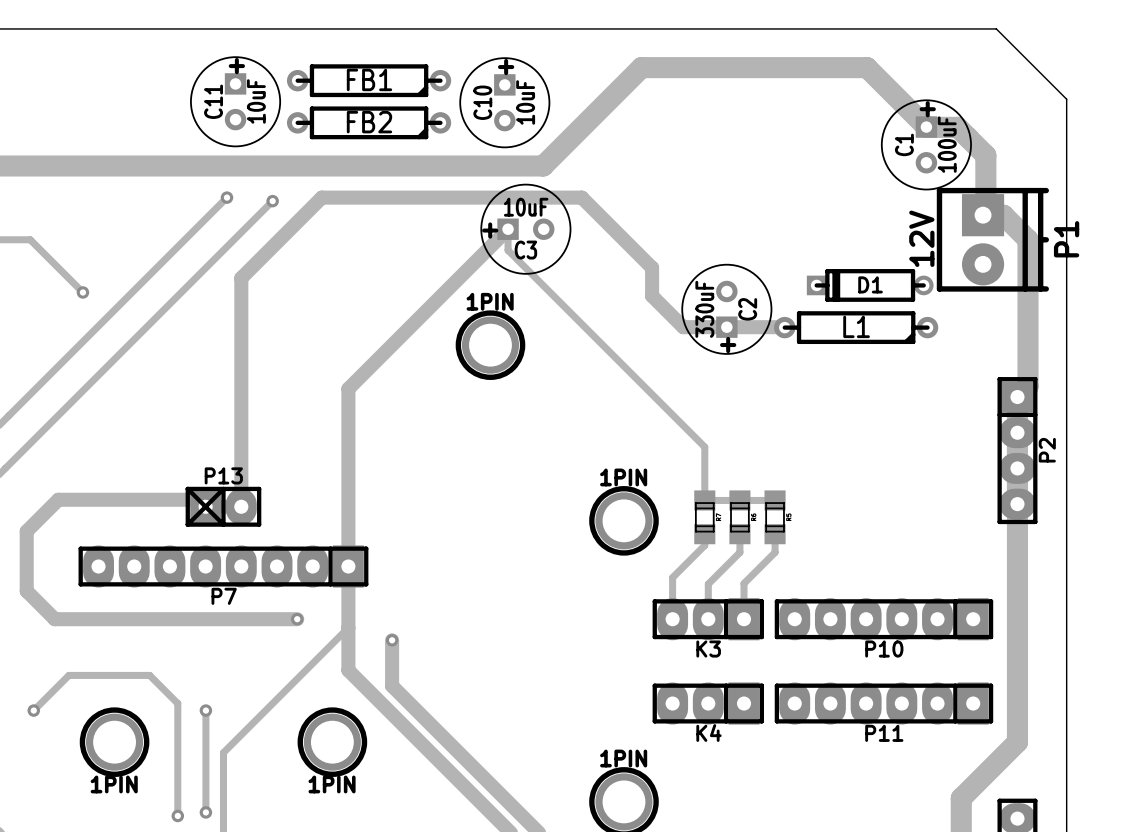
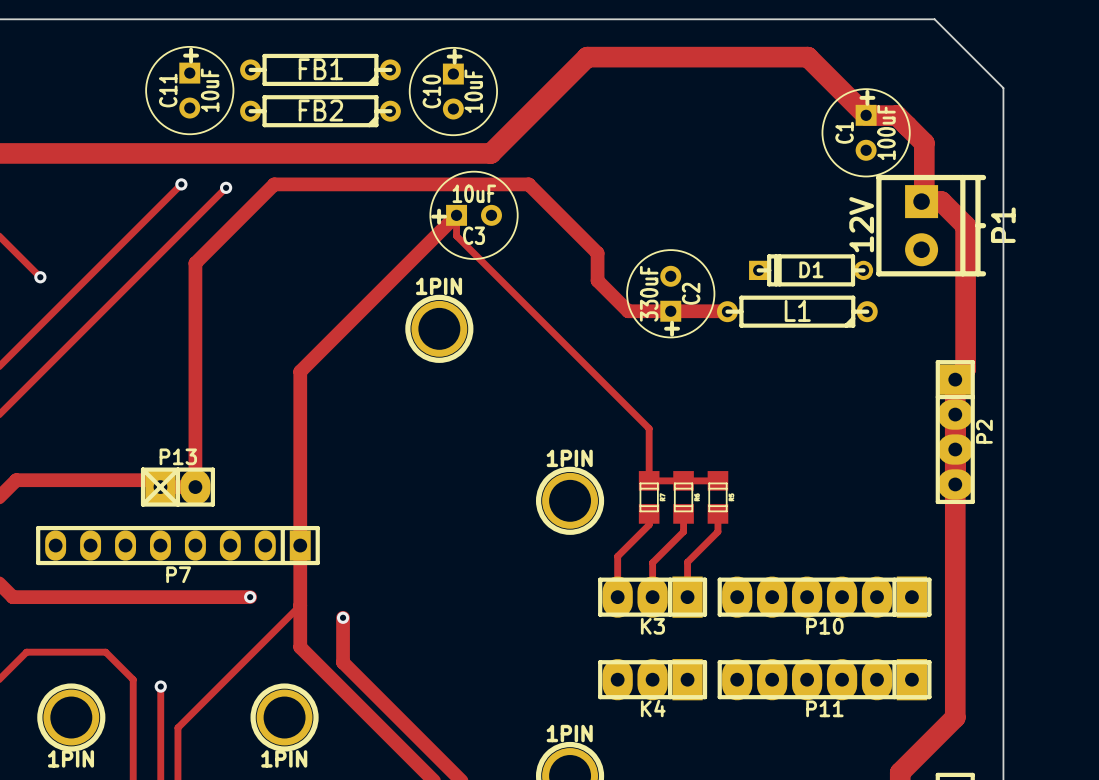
P1 footprint: [936, 187, 1049, 292] -> [876, 174, 987, 277]
P7 footprint: [78, 545, 369, 588] -> [36, 525, 320, 566]

